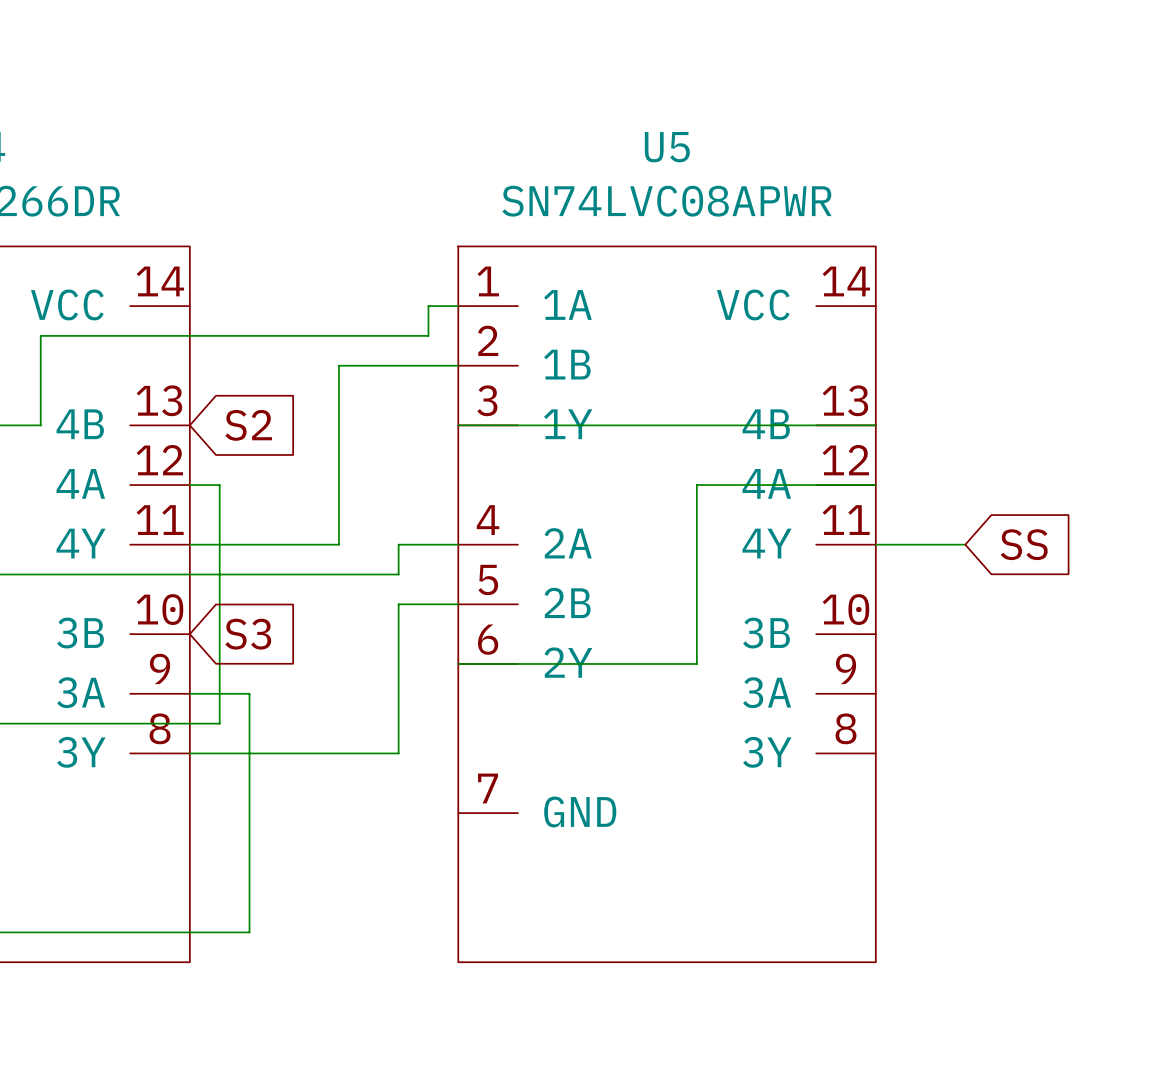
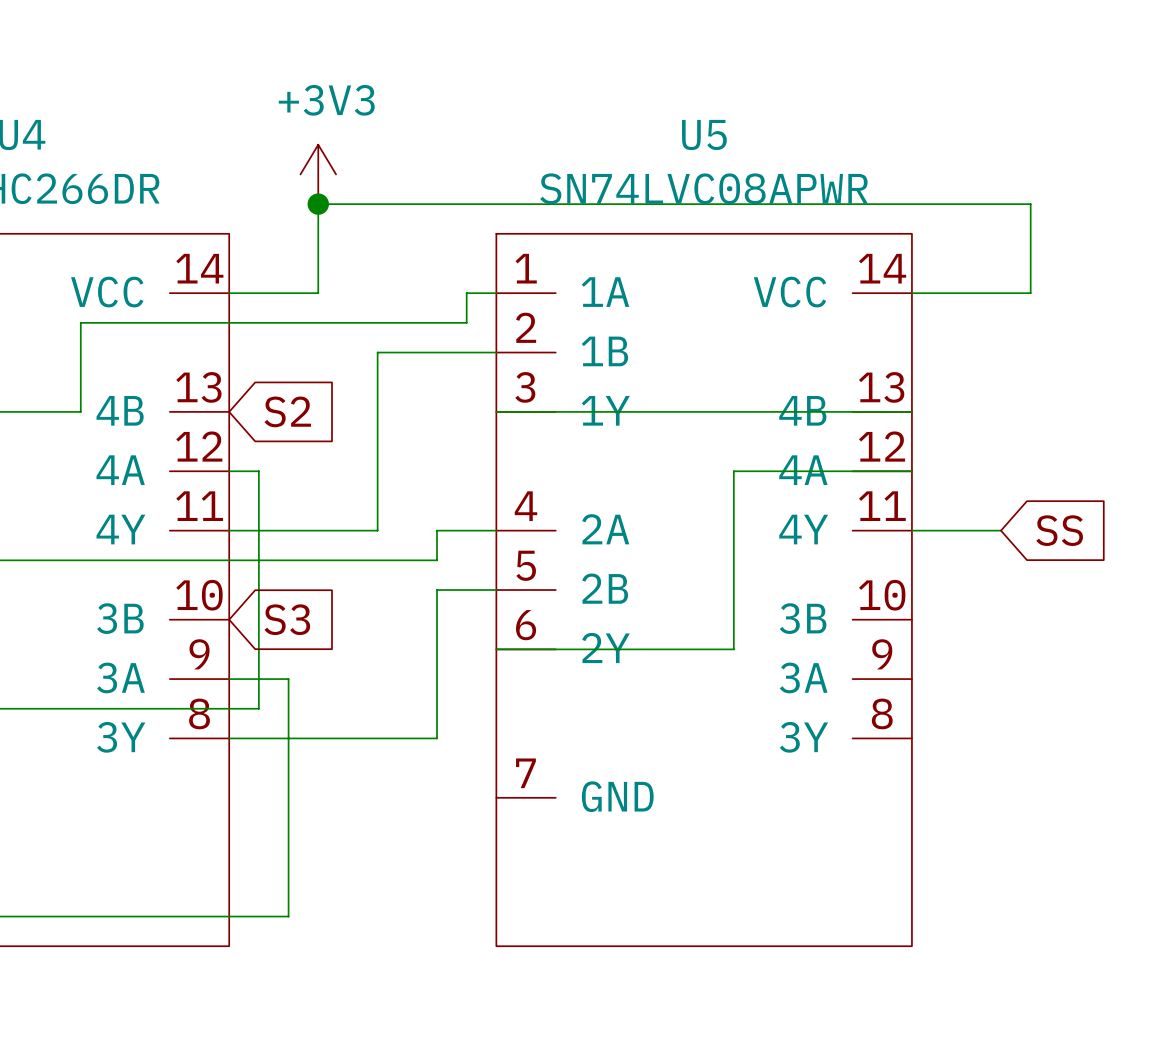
power symbol: none -> +3V3 (318, 174)
junction: none -> (318, 204)
wire: none -> (229, 293) (318, 293) (318, 204) (1030, 204) (1030, 293) (911, 293)

